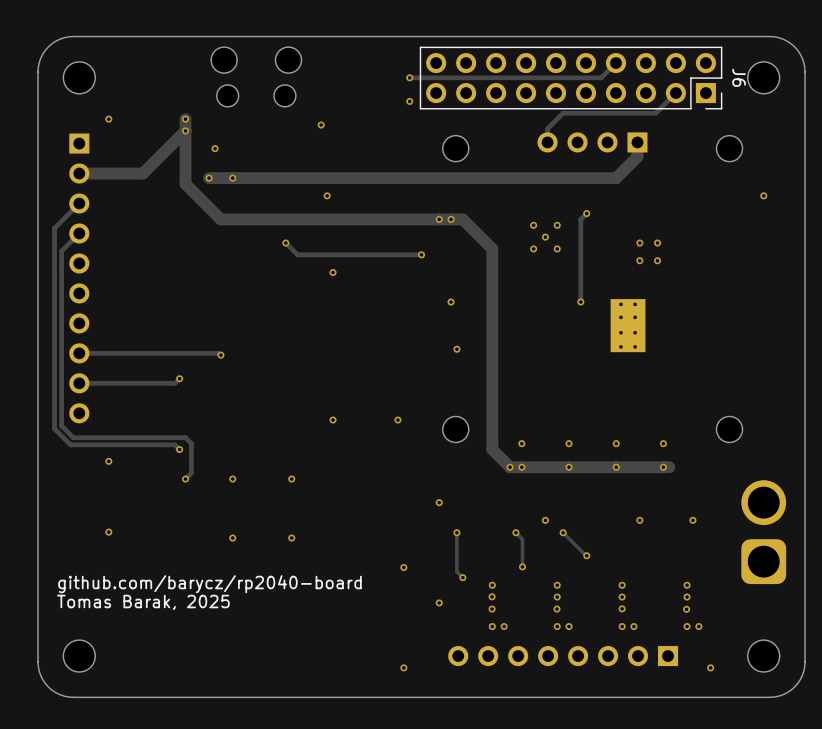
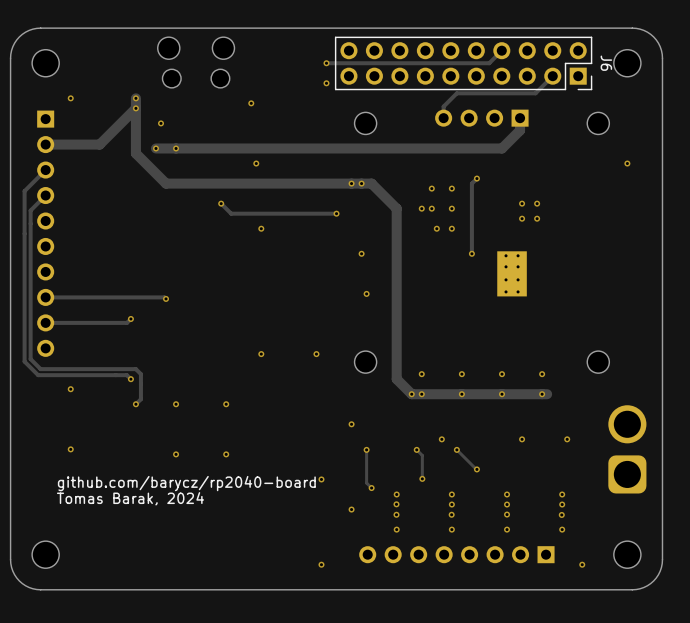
via: (545, 237) -> none
via: none -> (421, 208)
via: none -> (436, 228)
via: none -> (451, 228)
text position: github.com/barycz/rp2040-board (210, 584) -> github.com/barycz/rp2040-board (186, 483)
text: Tomas Barak, 2025 (143, 602) -> Tomas Barak, 2024 (130, 498)
via: (504, 626) -> none
via: (569, 626) -> none
via: (633, 626) -> none
via: (698, 626) -> none

